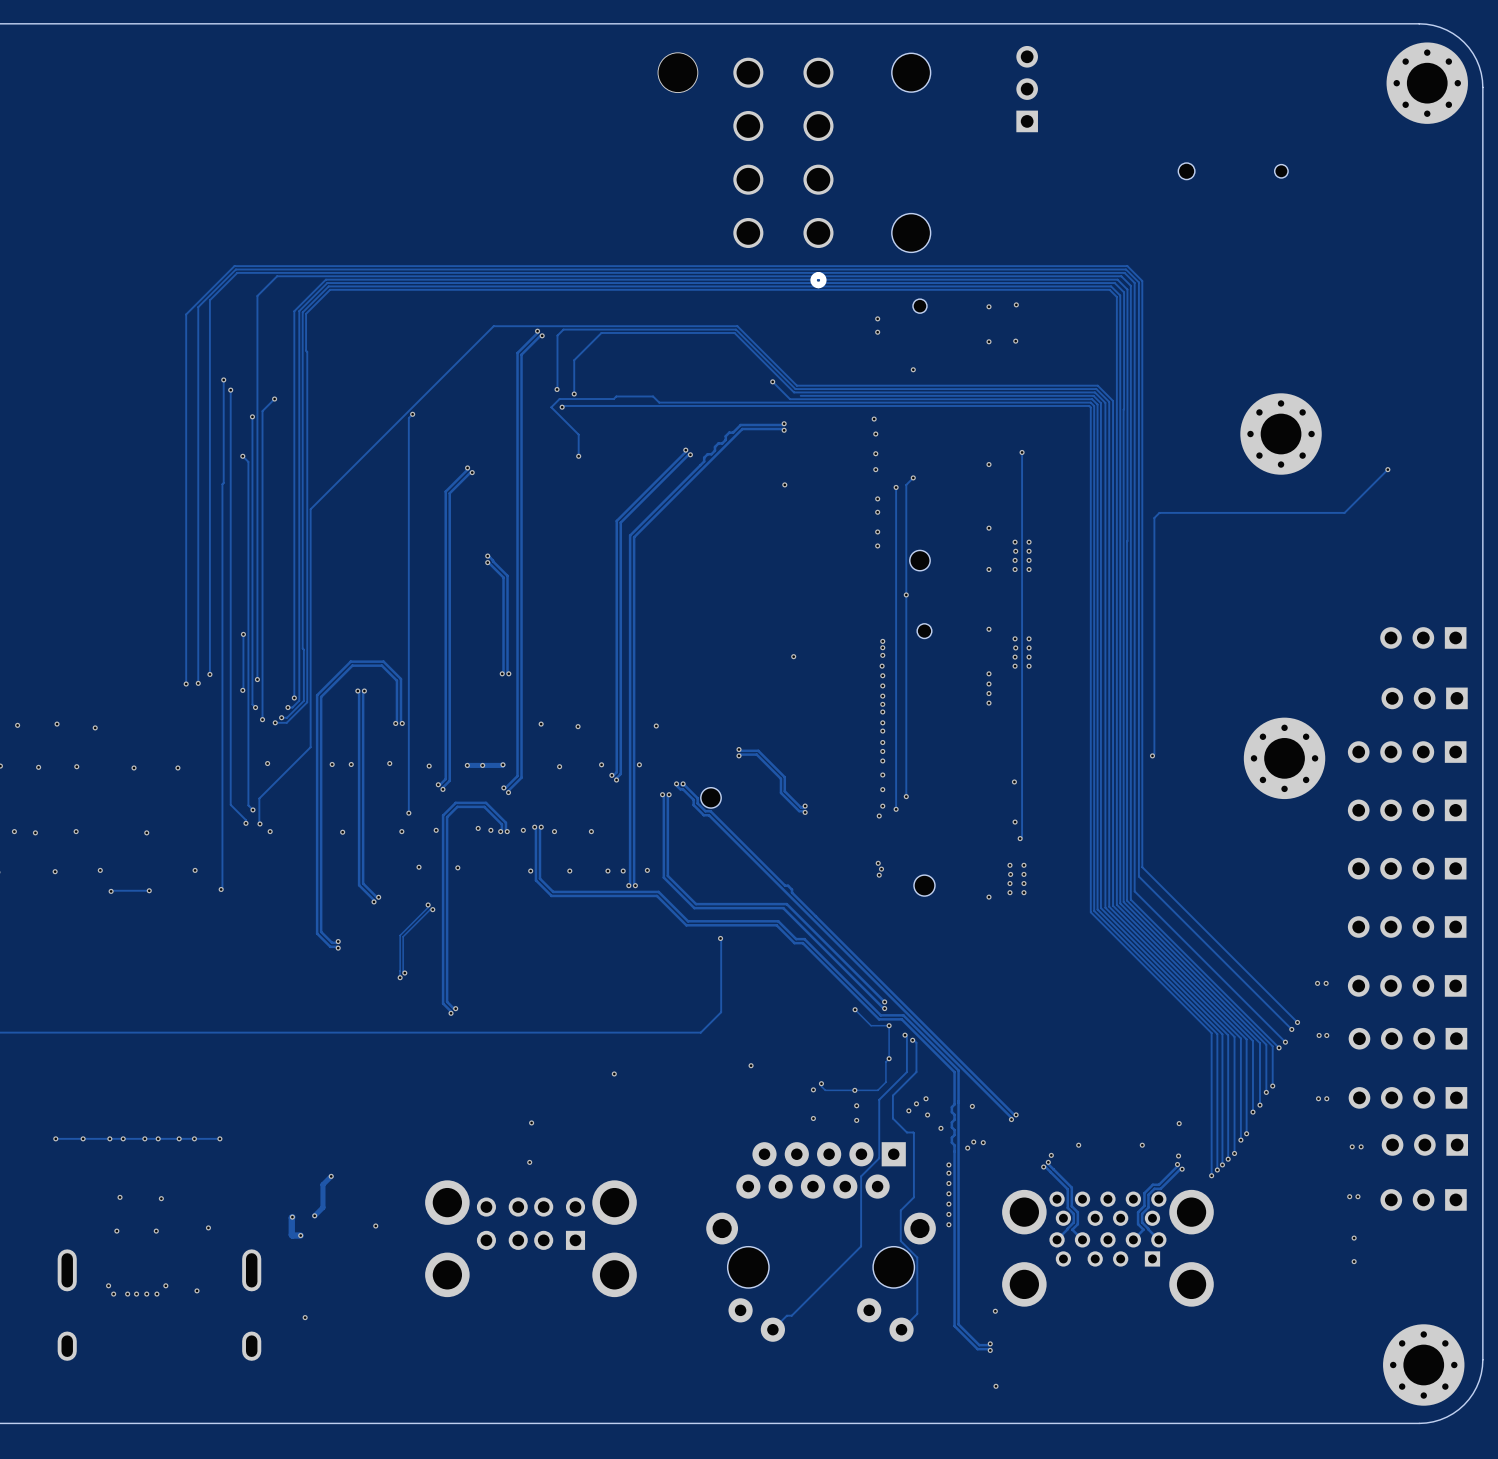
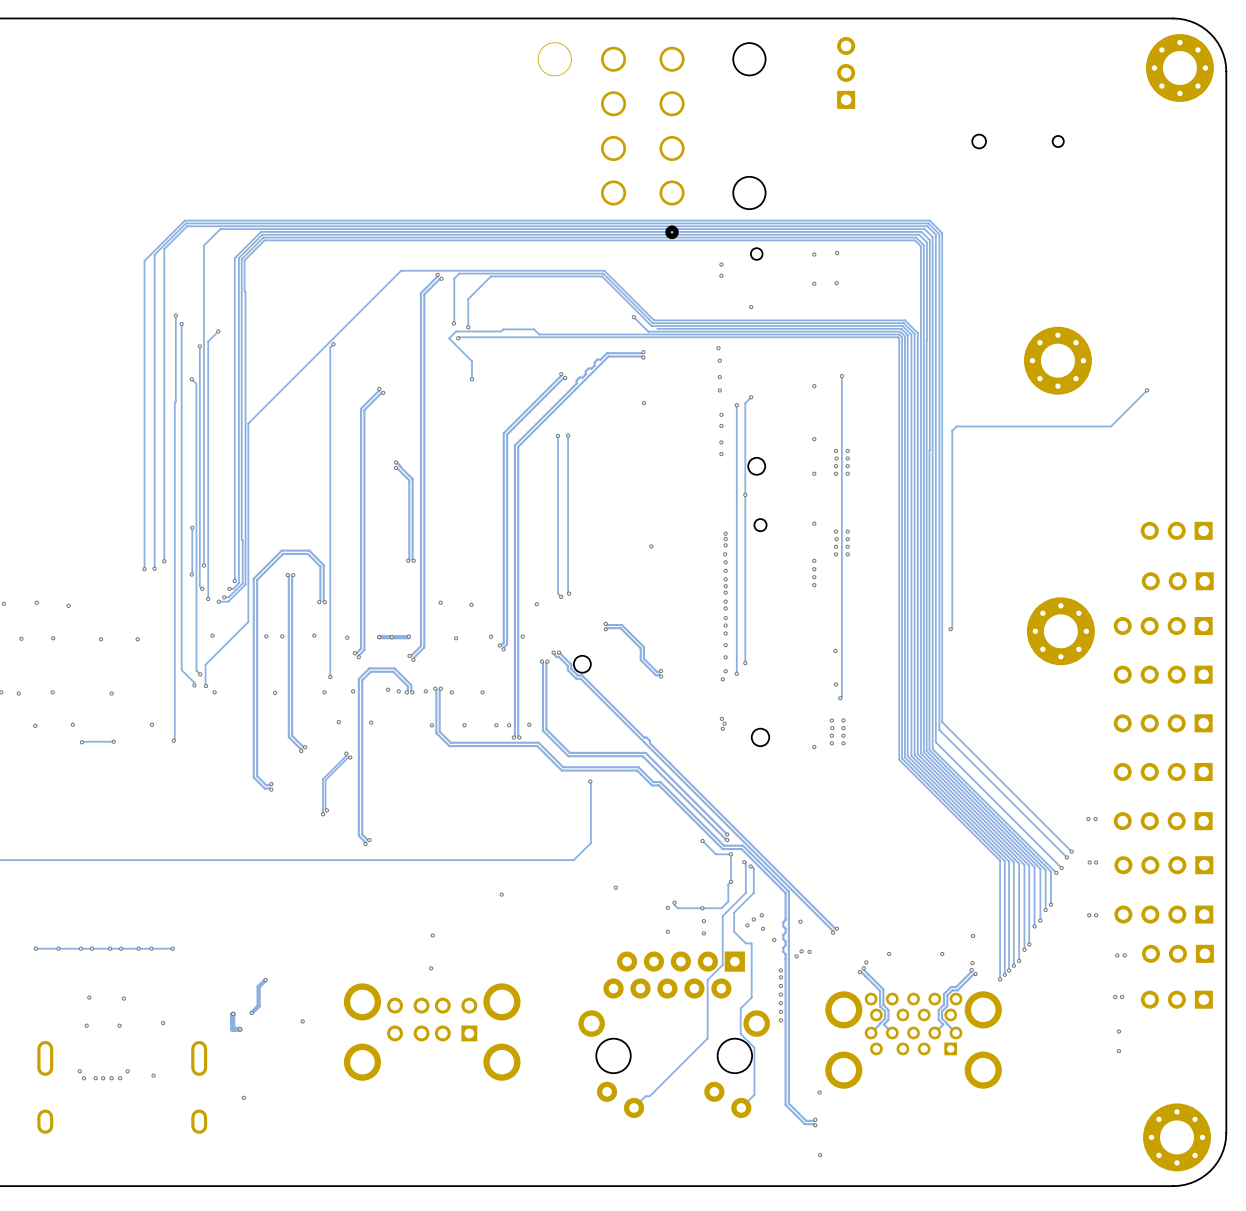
track: none -> (568, 435) (569, 593)
via: none -> (568, 435)
track: none -> (557, 436) (557, 593) (561, 596)
via: none -> (557, 436)
via: none -> (569, 593)
via: none -> (561, 596)

